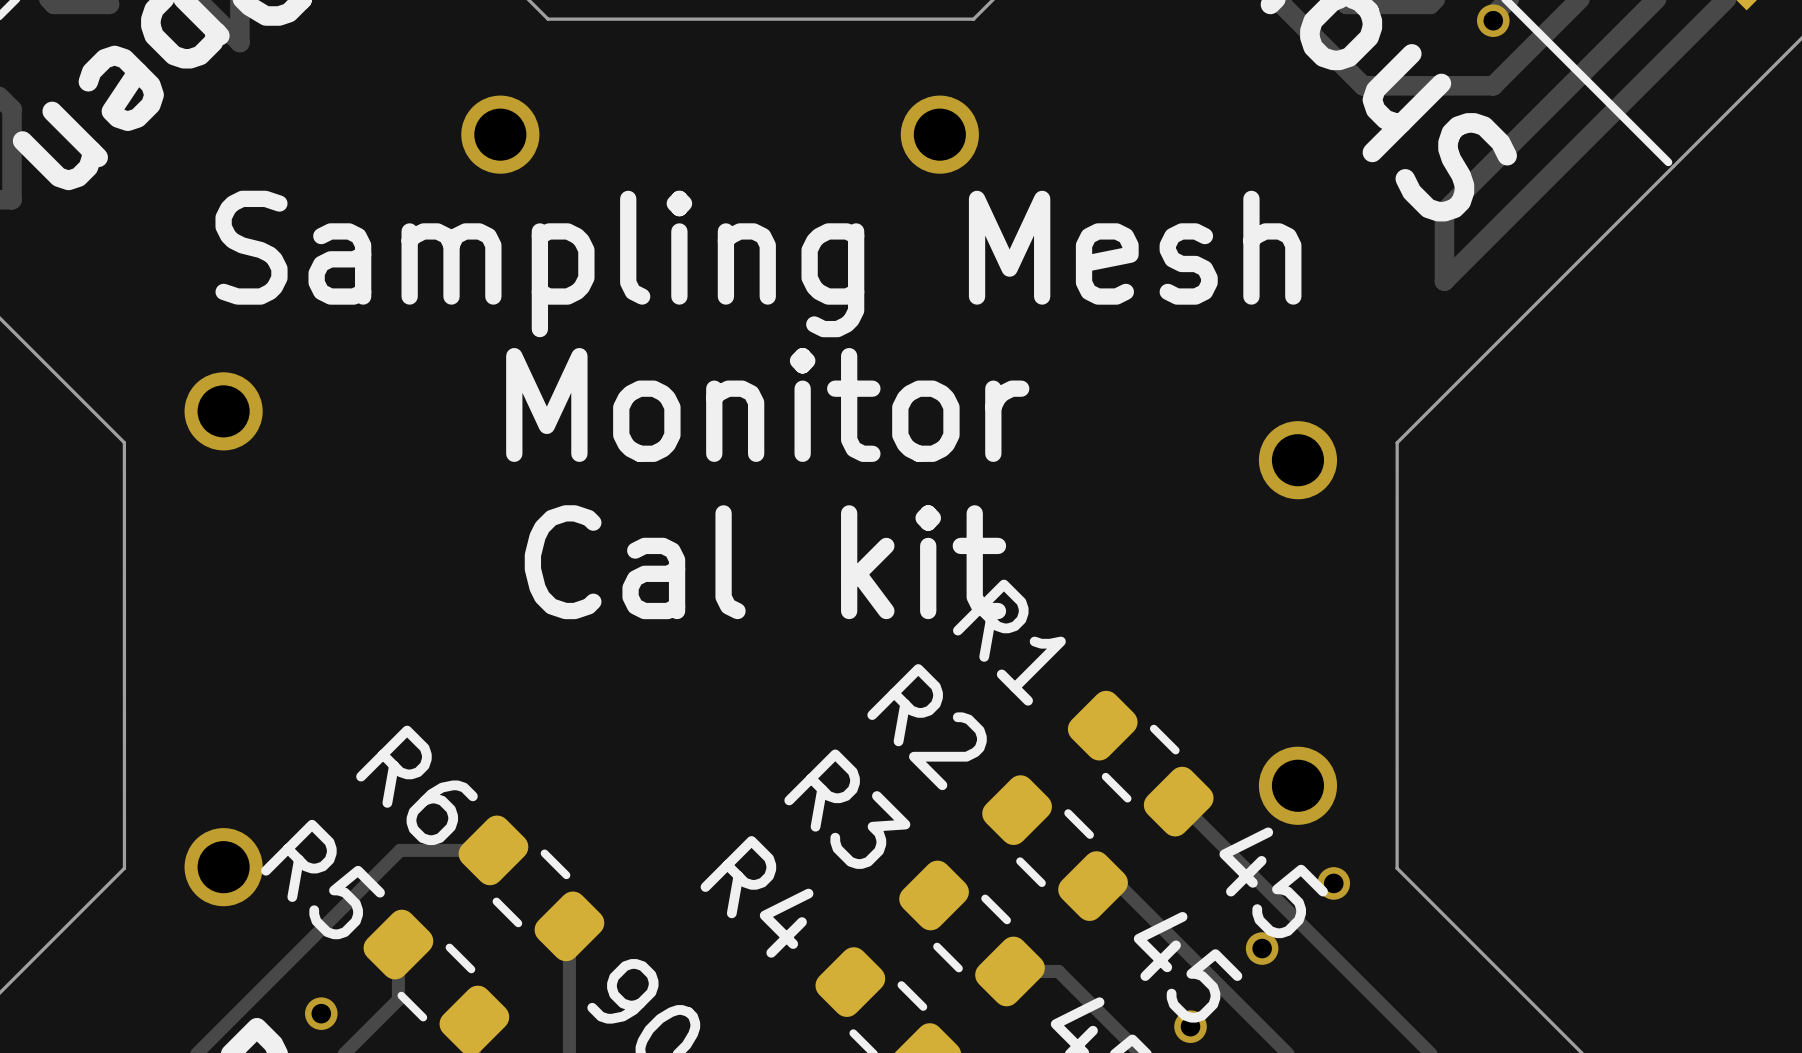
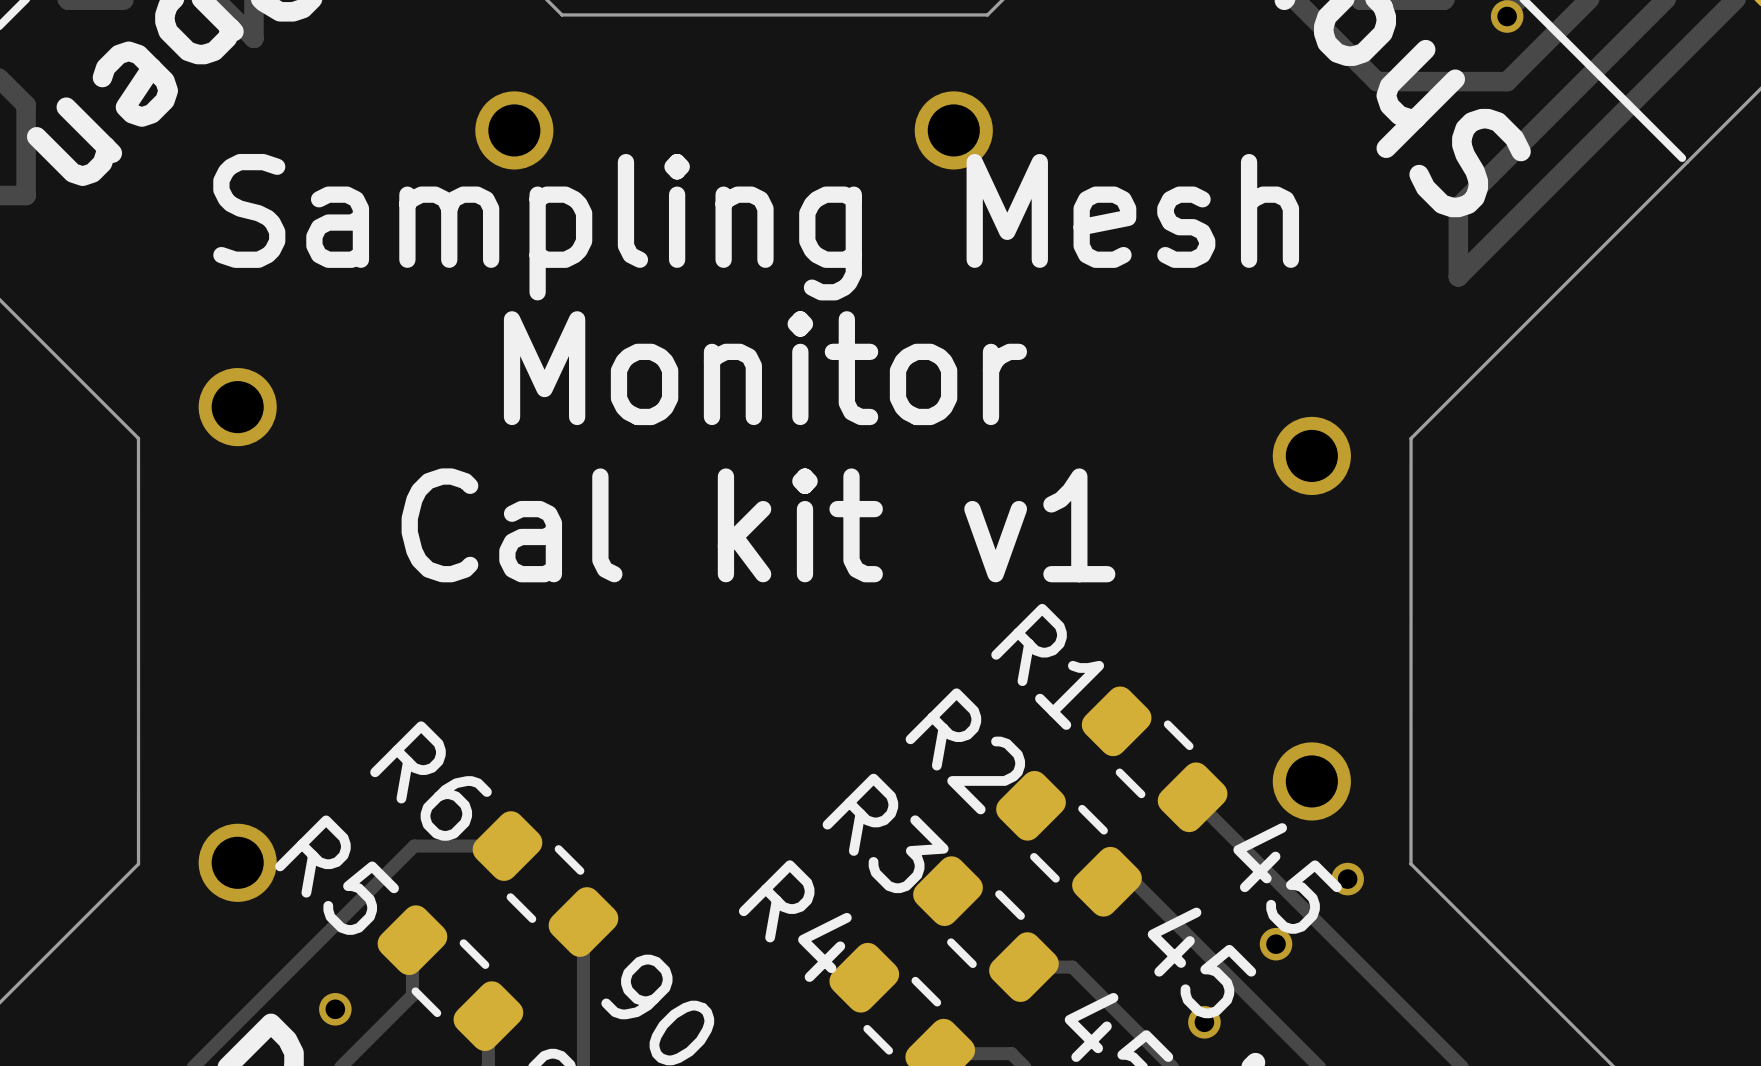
text position: Sampling Mesh (758, 263) -> Sampling Mesh (756, 227)
text position: Monitor (767, 404) -> Monitor (765, 368)
text: Cal kit (765, 562) -> Cal kit v1 (758, 525)
R1 name position: R1 (1009, 642) -> R1 (1047, 666)
R2 name position: R2 (927, 727) -> R2 (965, 751)
R3 name position: R3 (847, 809) -> R3 (885, 833)
R4 name position: R4 (757, 896) -> R4 (795, 921)

